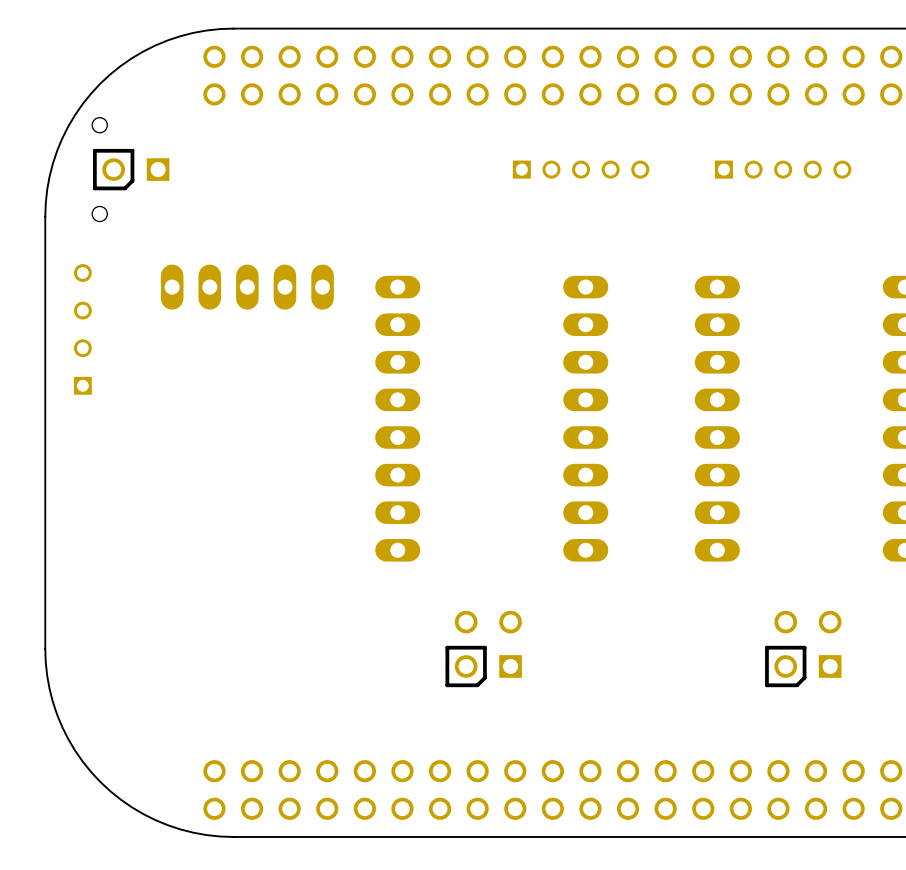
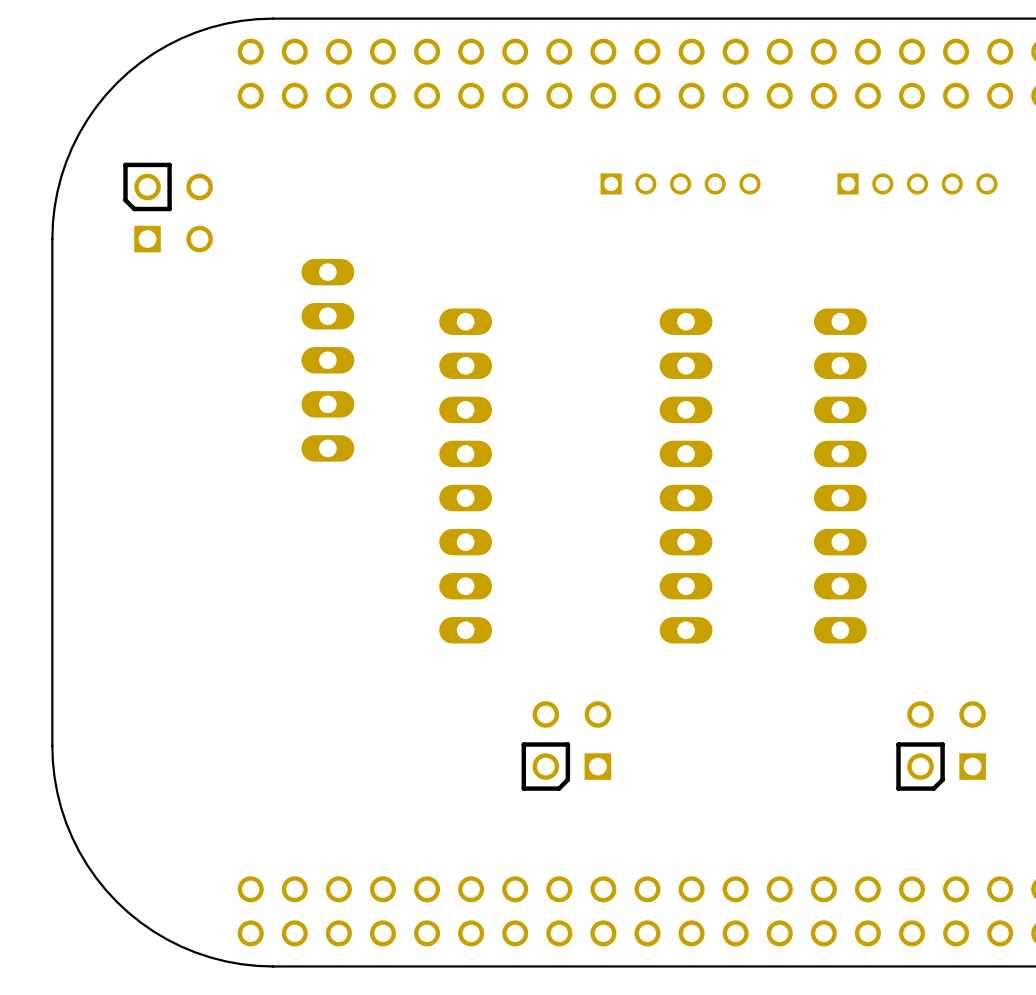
part: (130, 169) -> none
part: none -> (168, 207)
part rotation: 0° (247, 287) -> 90° clockwise (327, 360)
part: (82, 329) -> none

